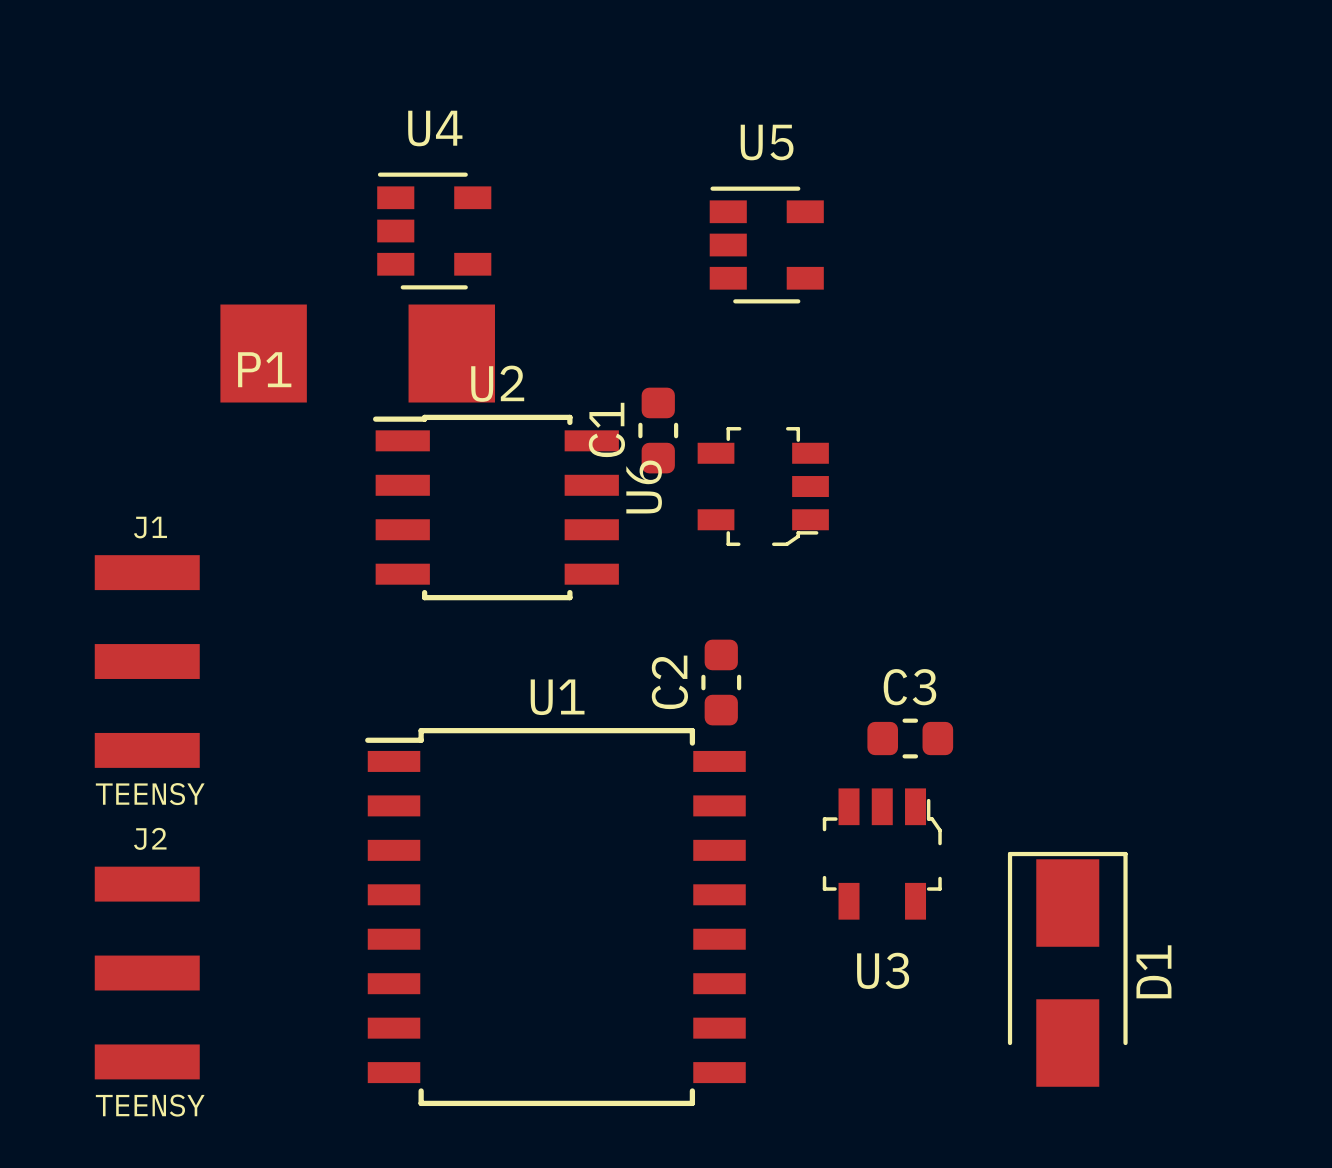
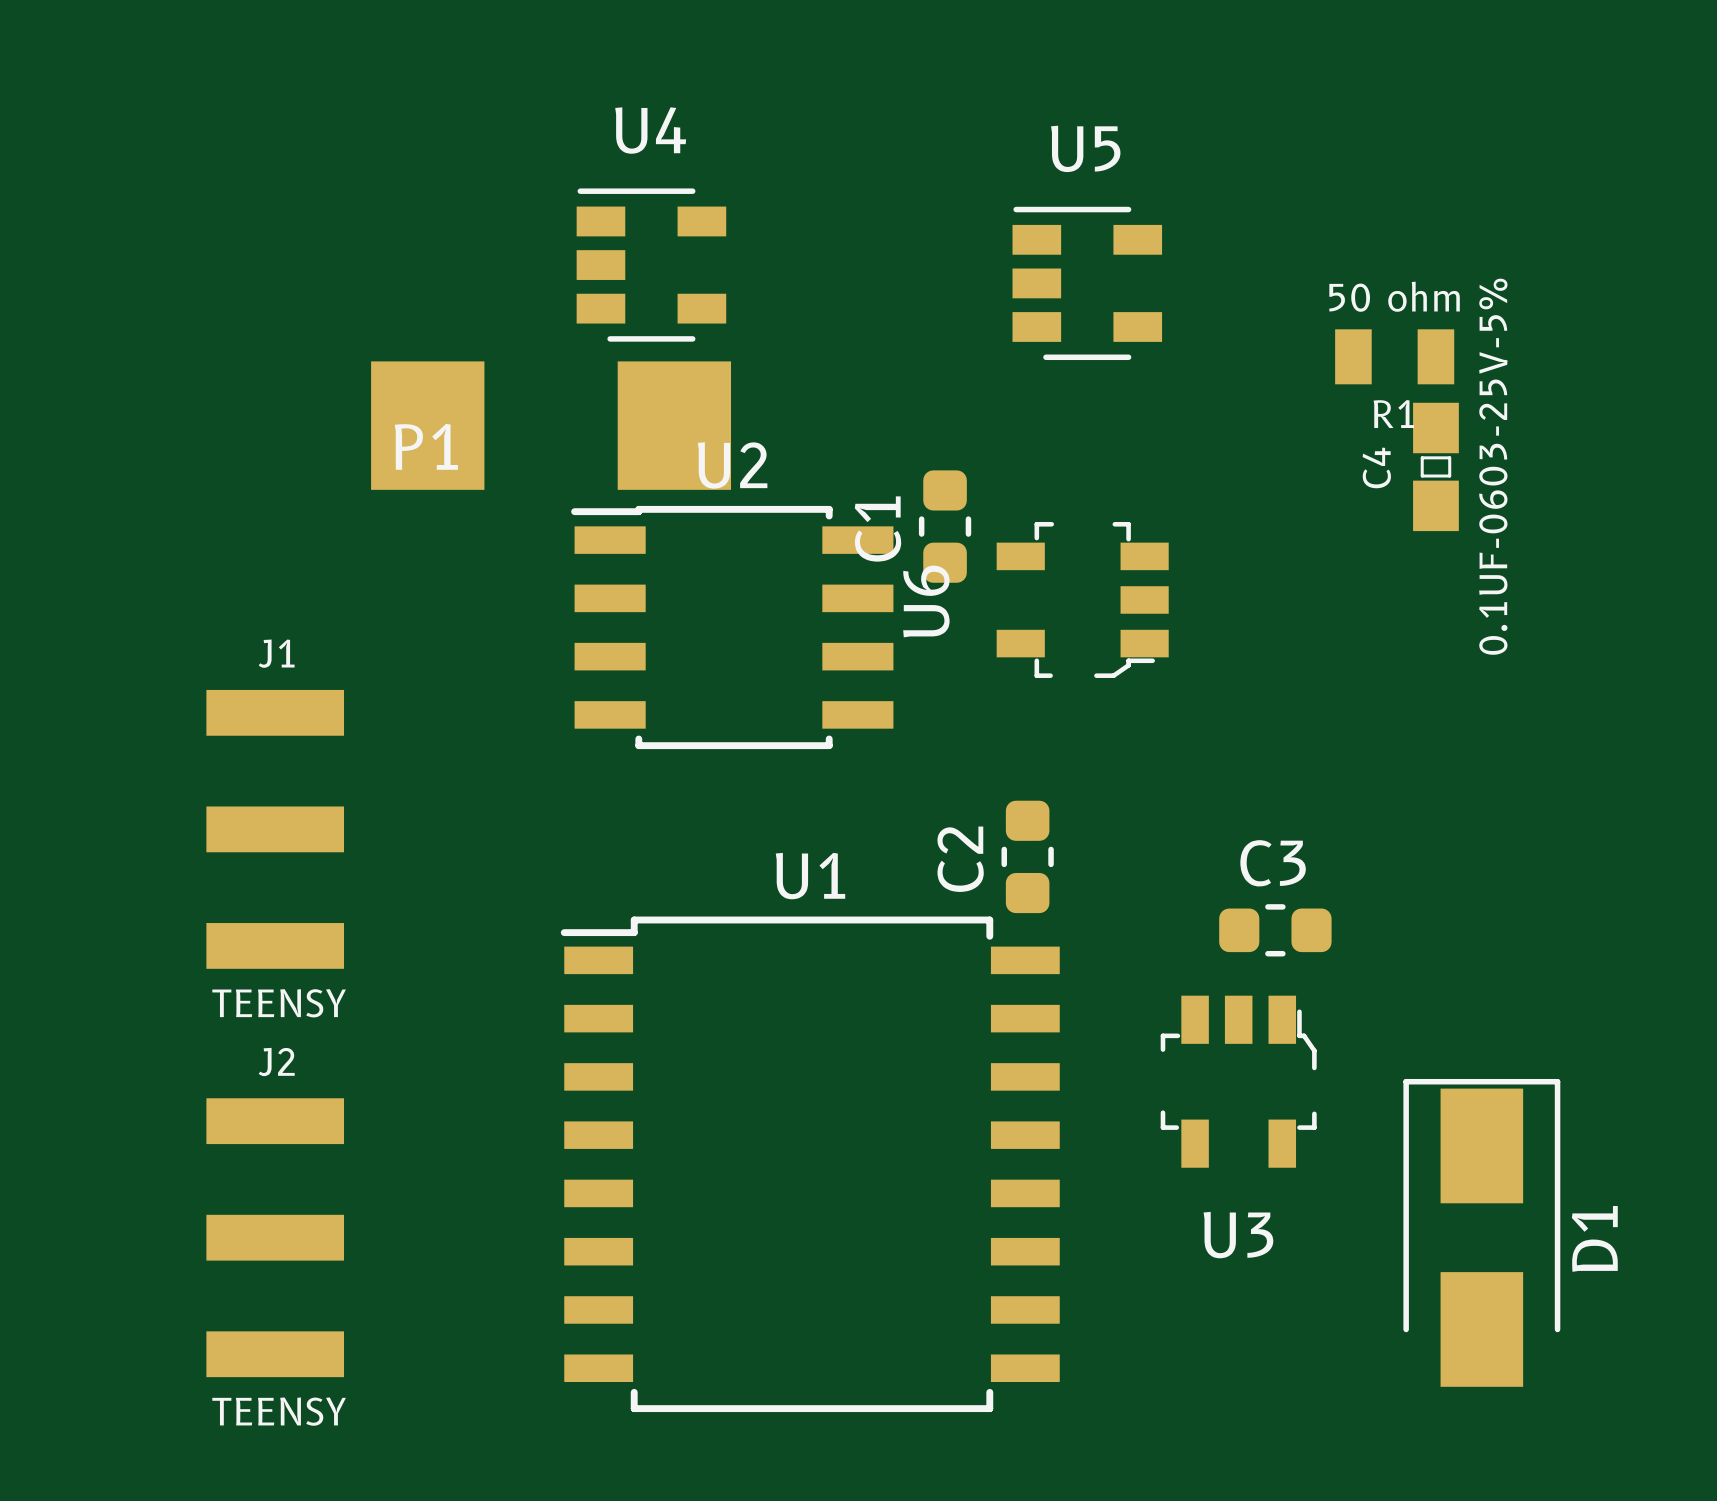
R1: none -> 50 ohm (1394, 356)
C4: none -> 0.1UF-0603-25V-5% (1435, 466)

